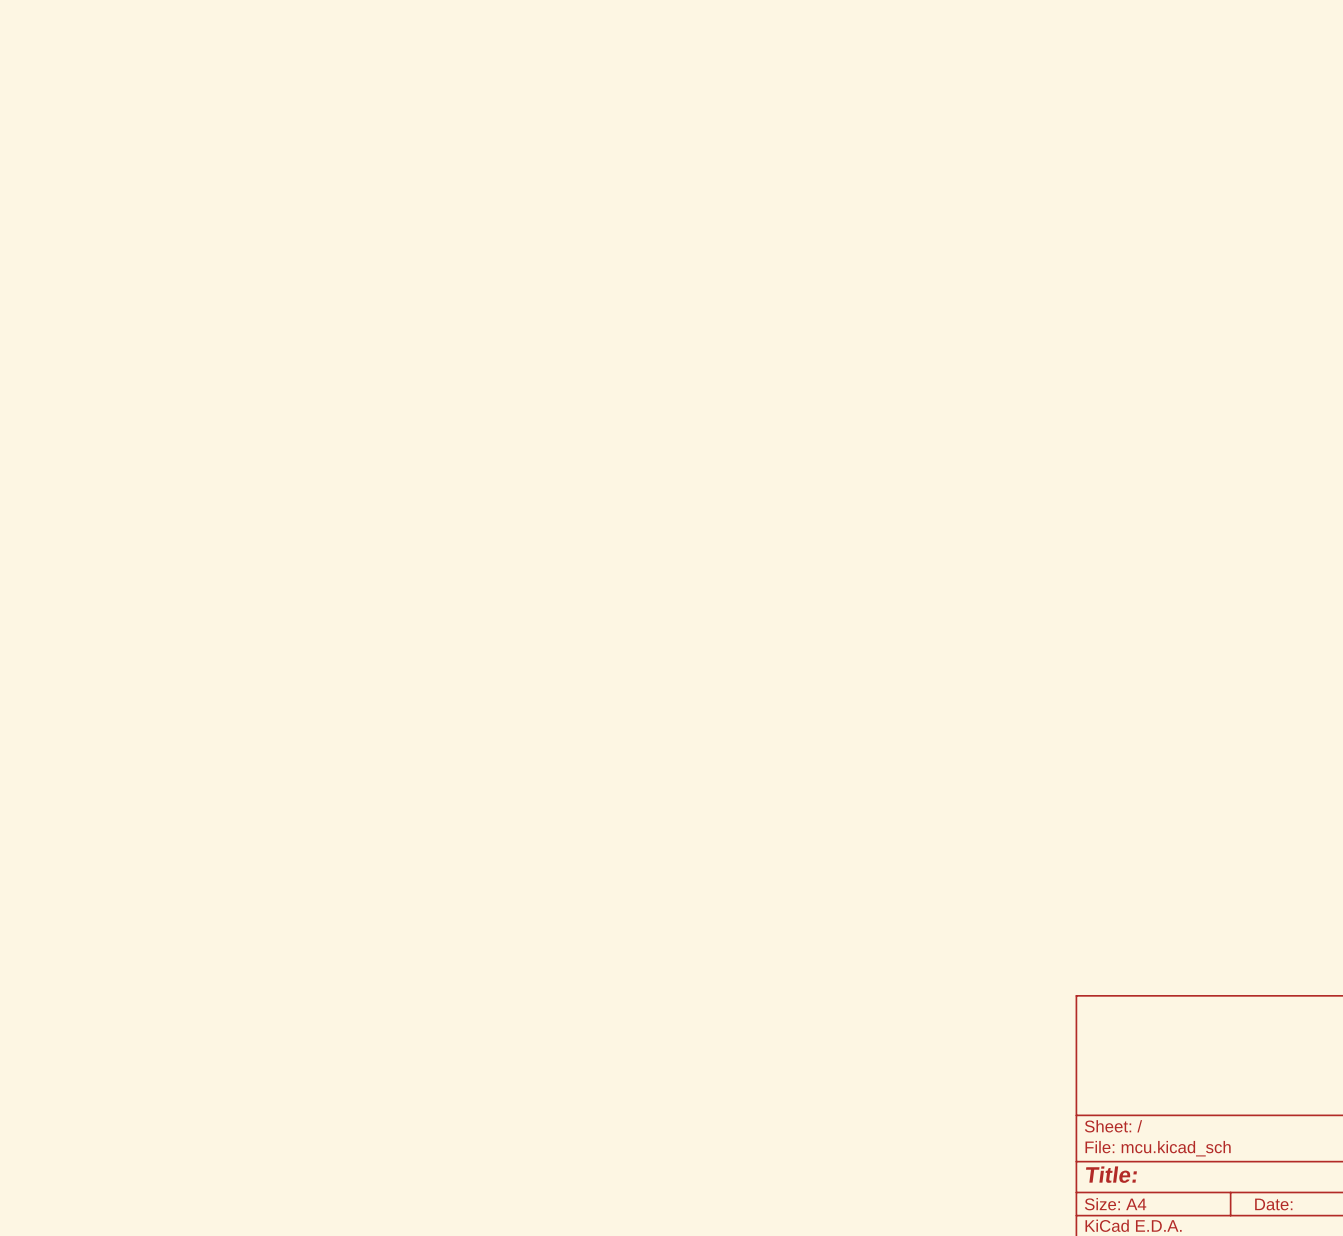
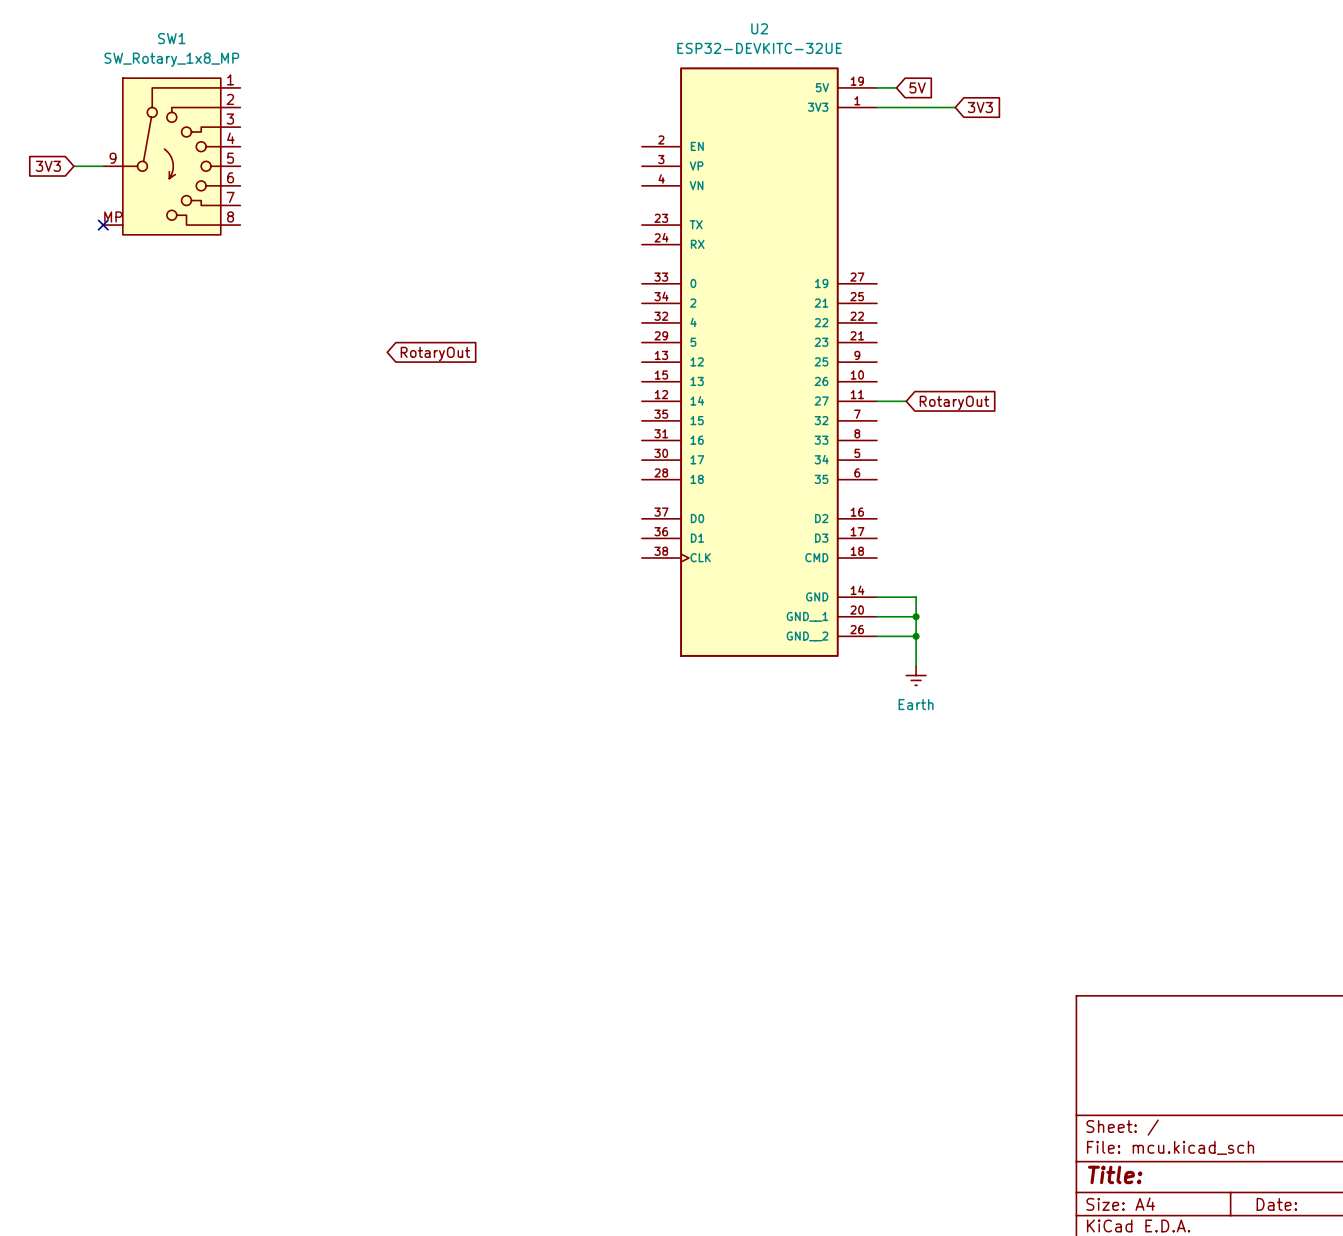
wire: none -> (876, 87) (896, 87)
global label: none -> 5V (917, 87)
wire: none -> (876, 107) (955, 107)
global label: none -> 3V3 (980, 107)
SW1: none -> SW_Rotary_1x8_MP (171, 156)
global label: none -> 3V3 (48, 166)
wire: none -> (73, 166) (103, 166)
no-connect mark: none -> (103, 225)
global label: none -> RotaryOut (435, 353)
U2: none -> ESP32-DEVKITC-32UE (759, 362)
wire: none -> (876, 401) (906, 401)
global label: none -> RotaryOut (954, 402)
wire: none -> (876, 597) (916, 597) (916, 665)
wire: none -> (876, 616) (916, 616)
junction: none -> (916, 616)
wire: none -> (876, 636) (916, 636)
junction: none -> (916, 636)
power symbol: none -> Earth (916, 675)

